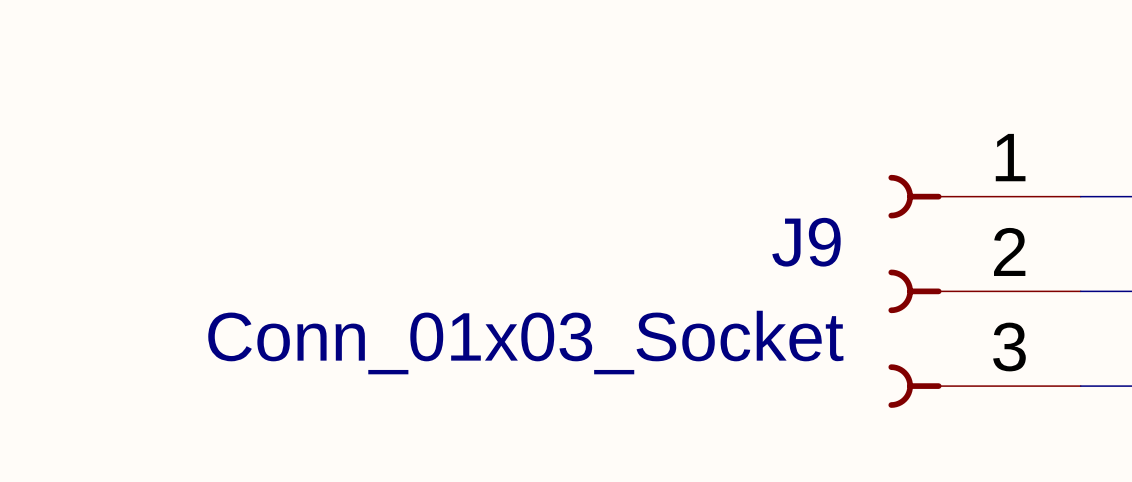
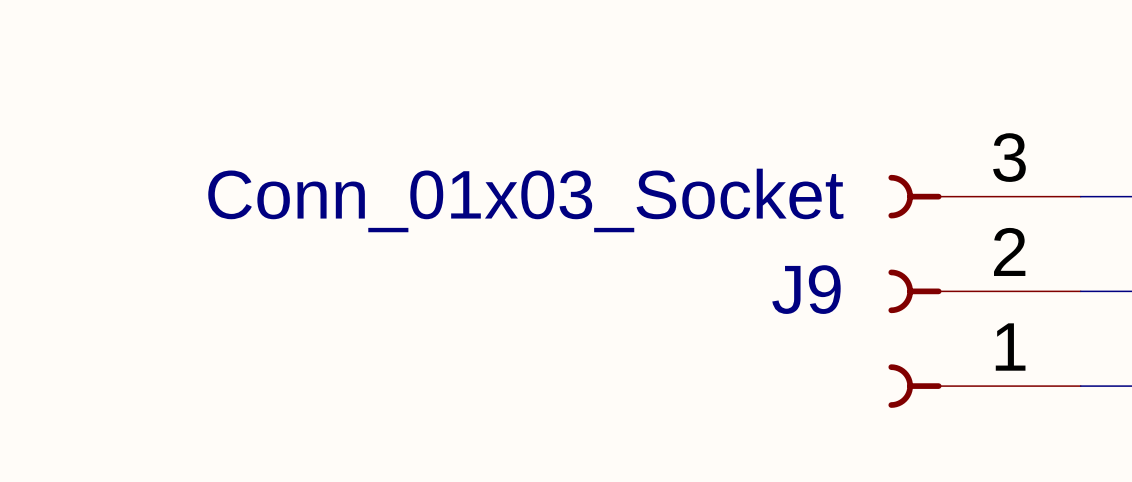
J9 flip: as is (914, 291) -> up-down (914, 291)

